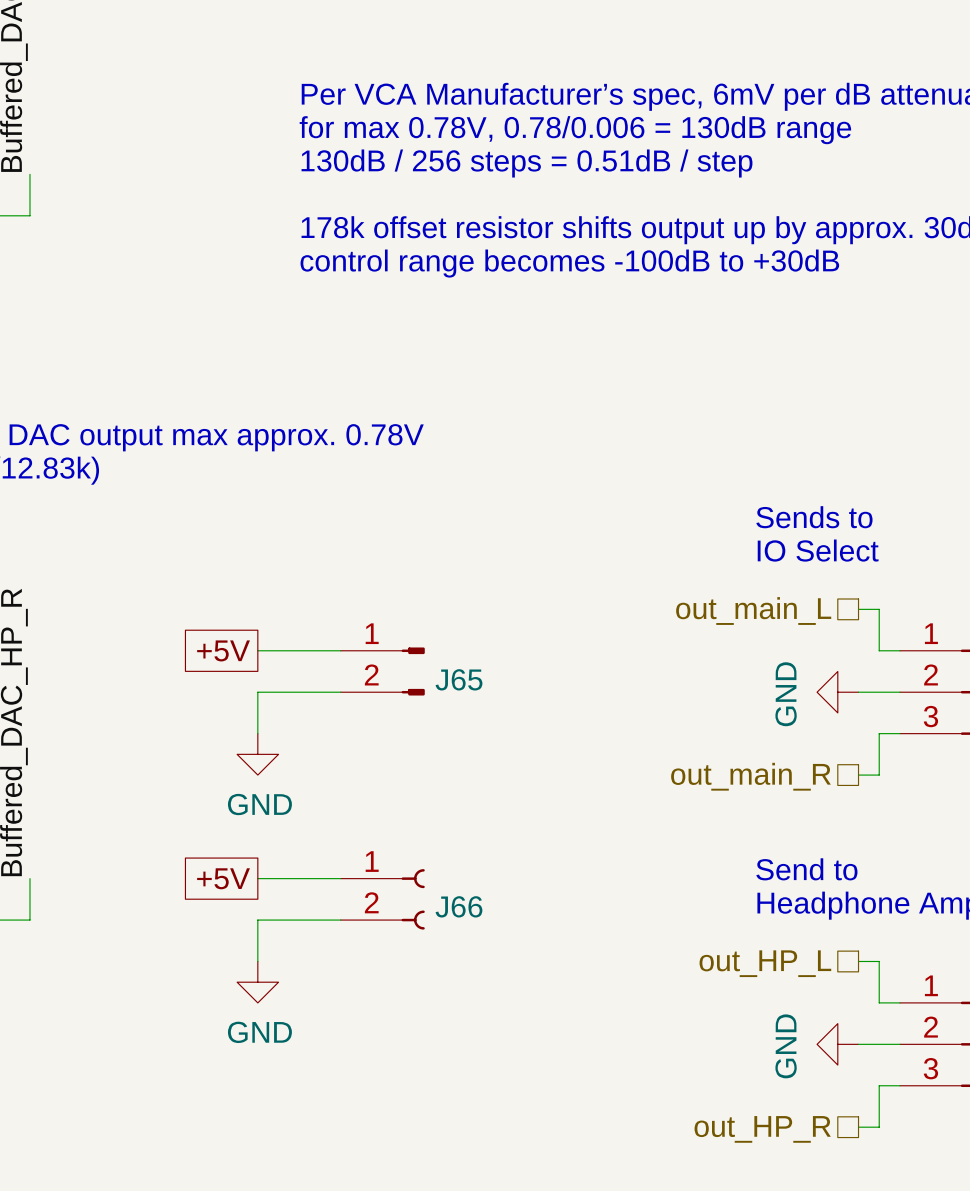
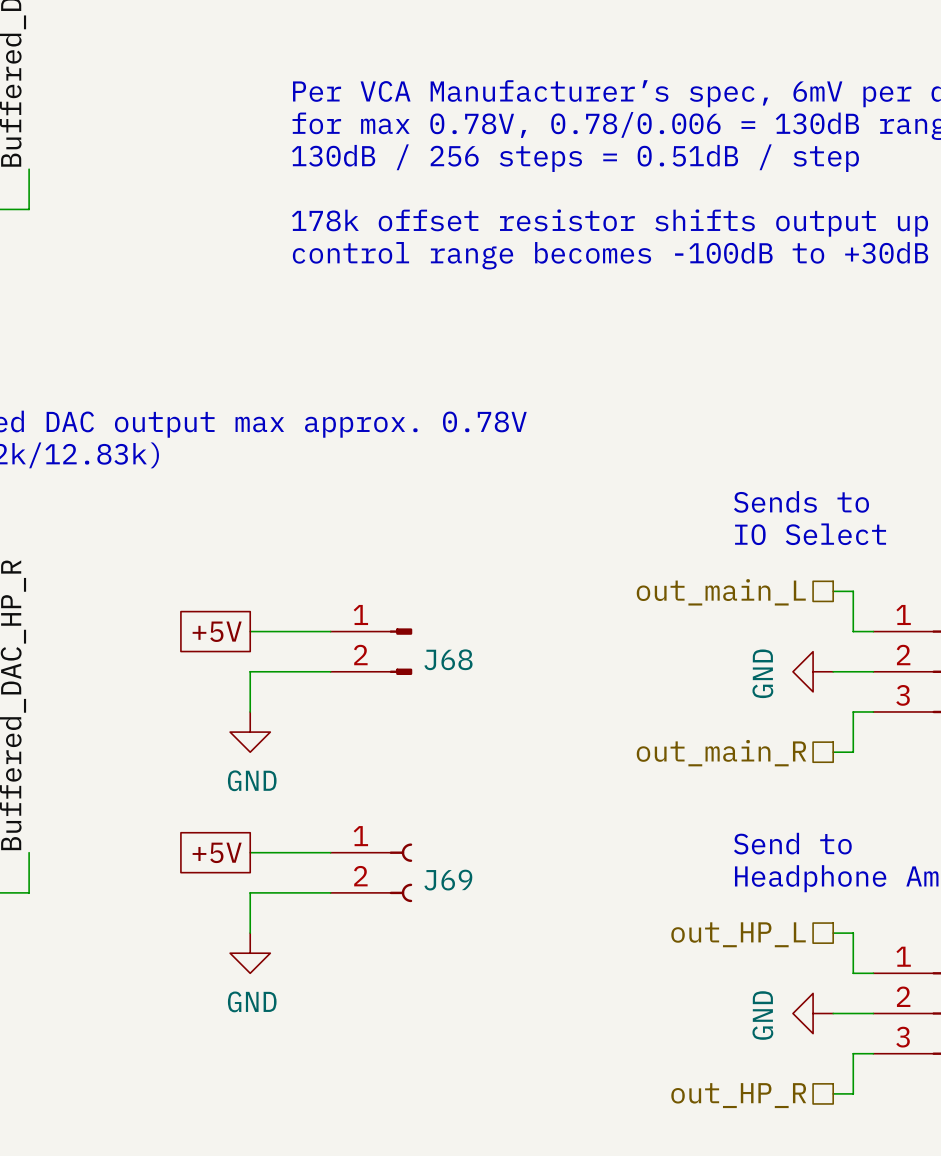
J65 name: J65 (459, 679) -> J68 (448, 659)
J66 name: J66 (458, 906) -> J69 (448, 880)

